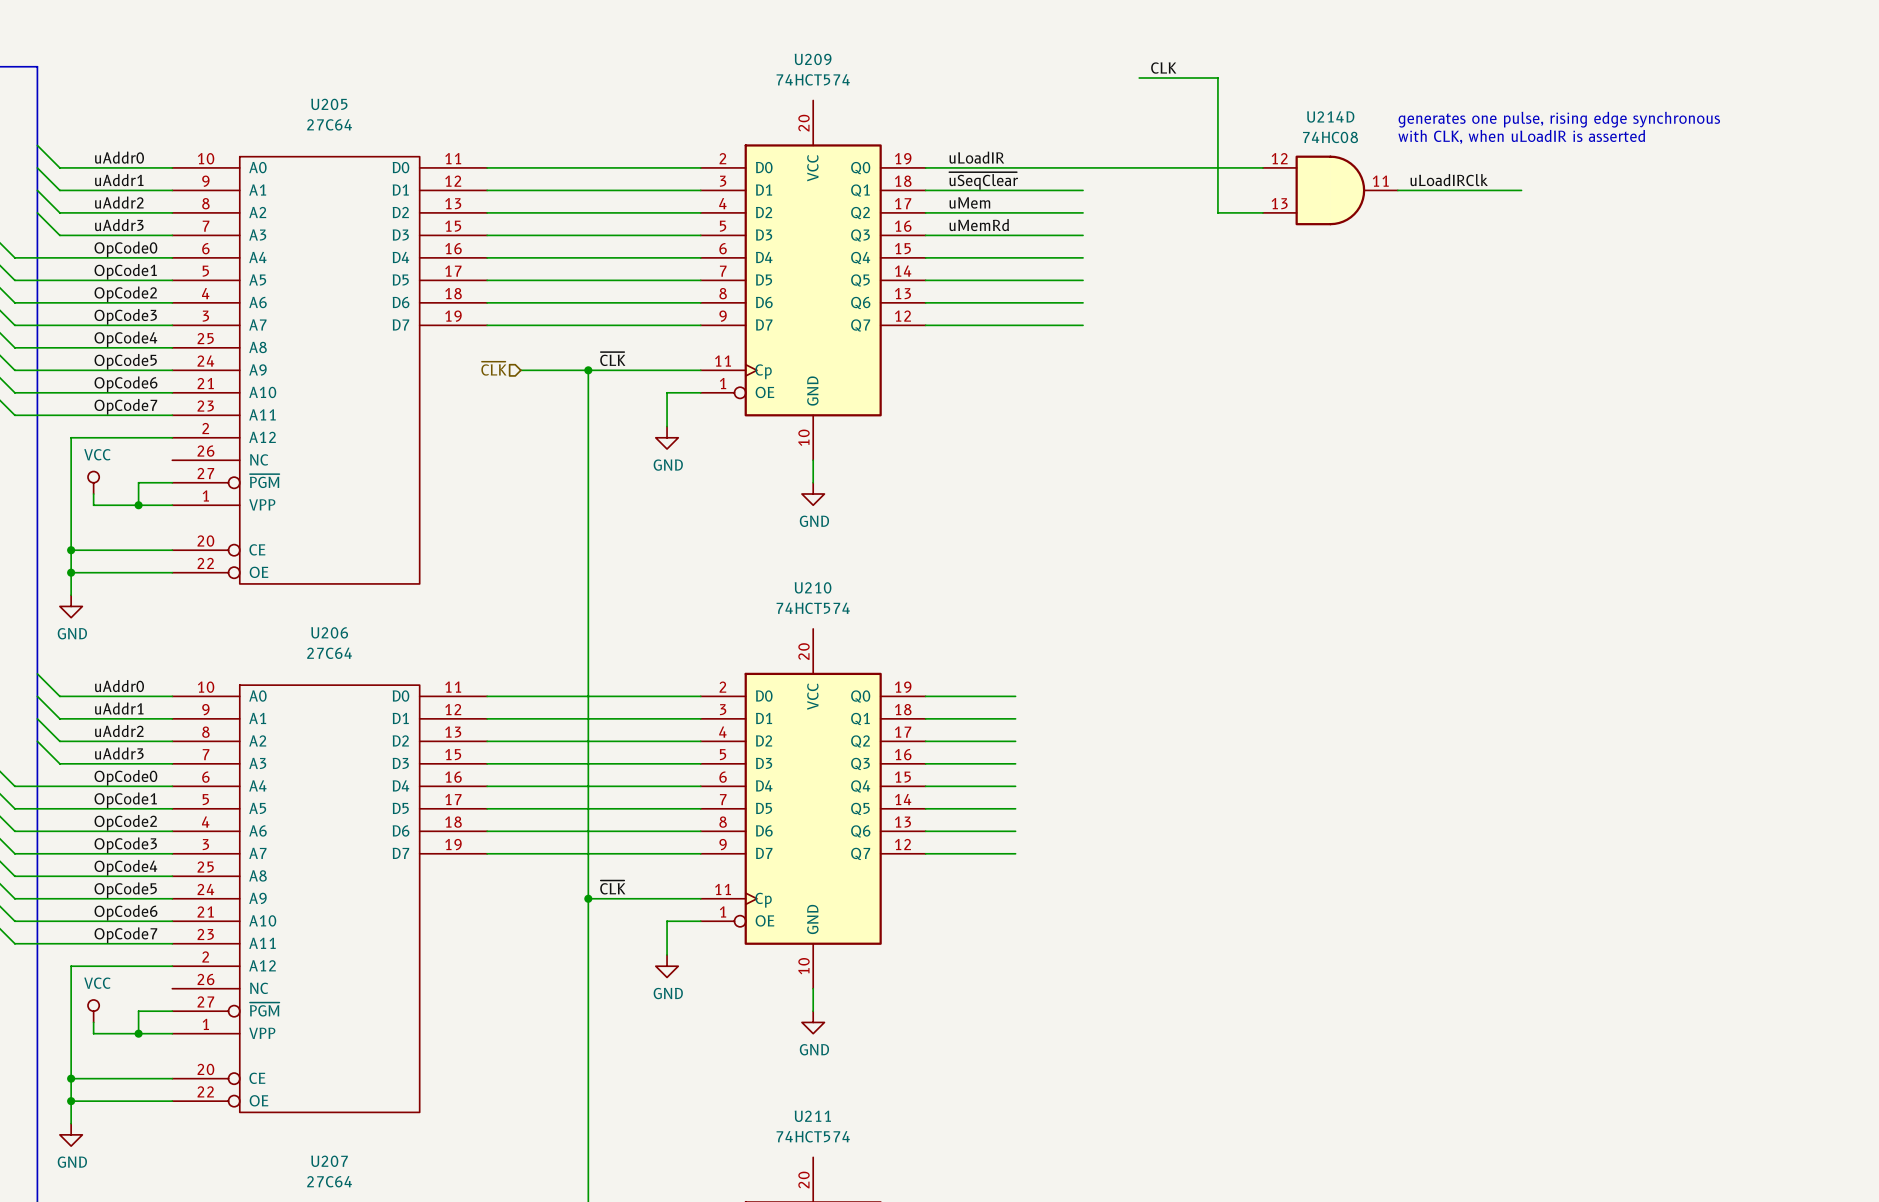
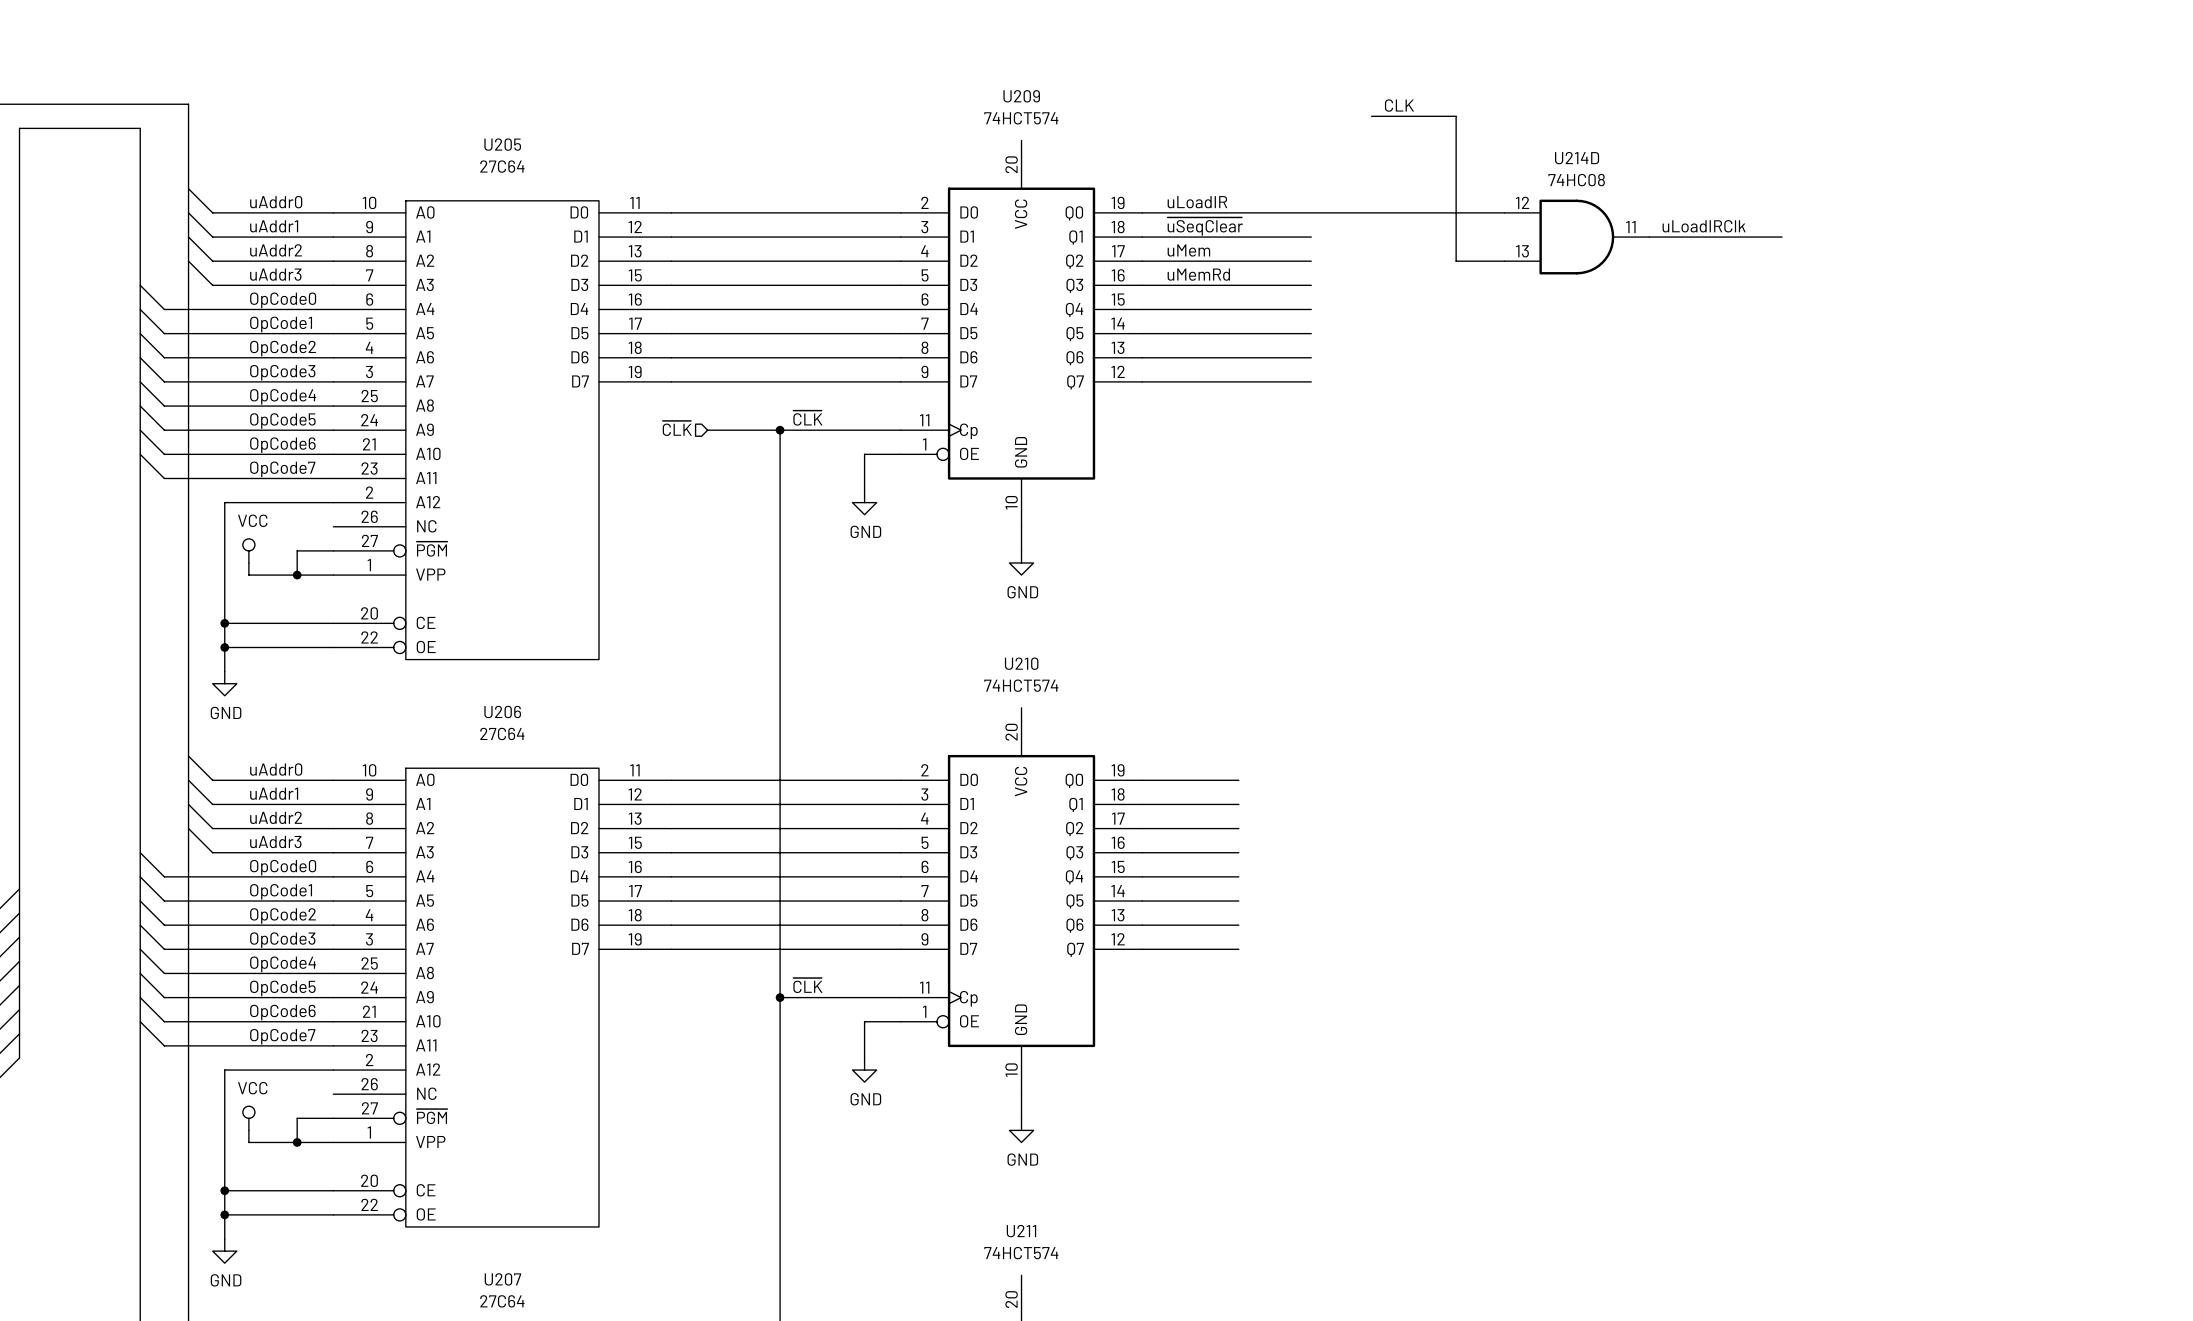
text: generates one pulse, rising edge synchronous (1559, 119) -> none
text: with CLK, when uLoadIR is asserted (1521, 136) -> none

